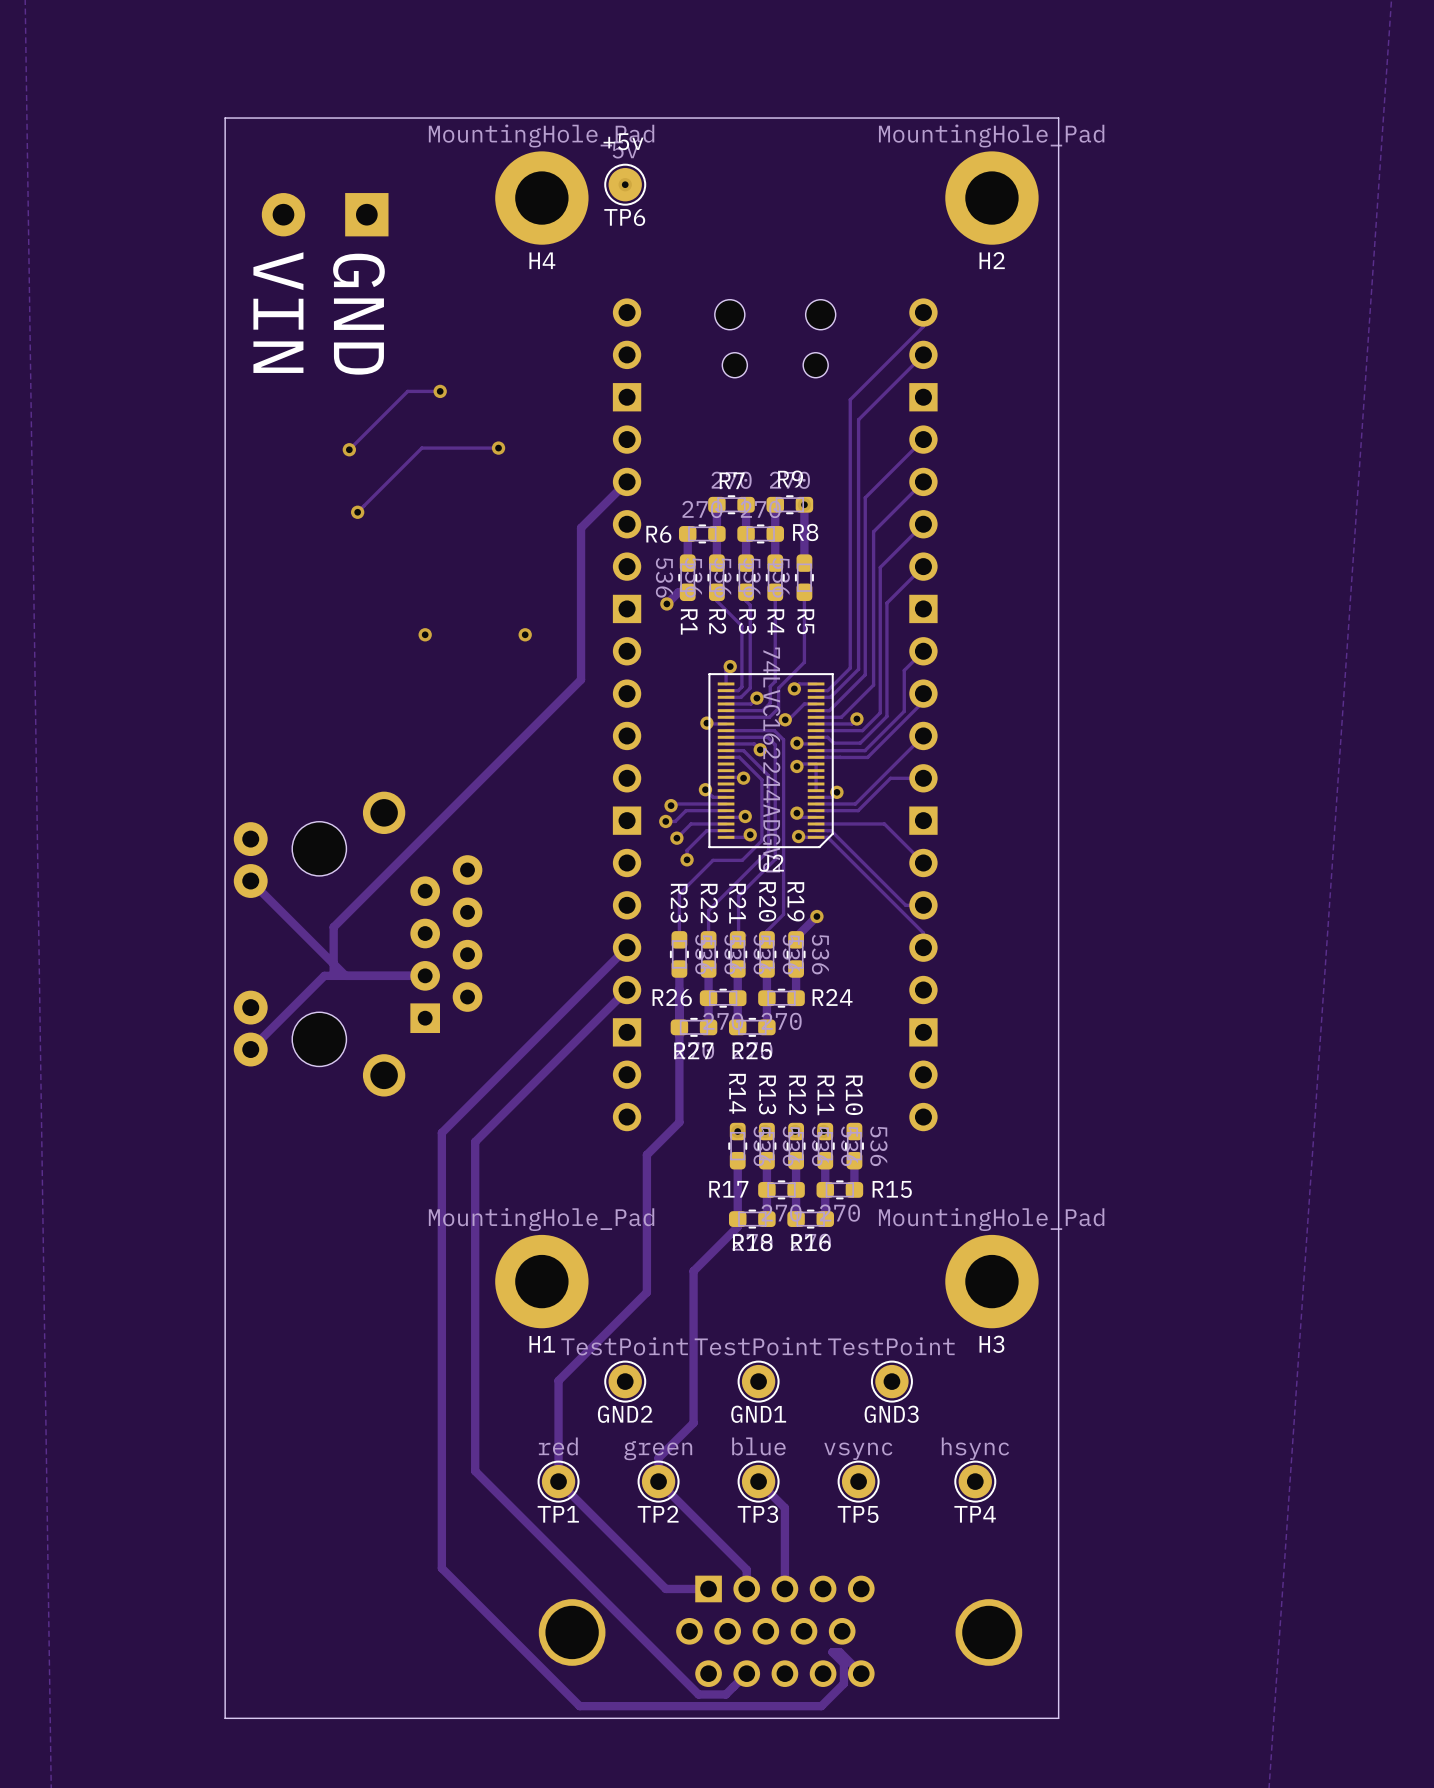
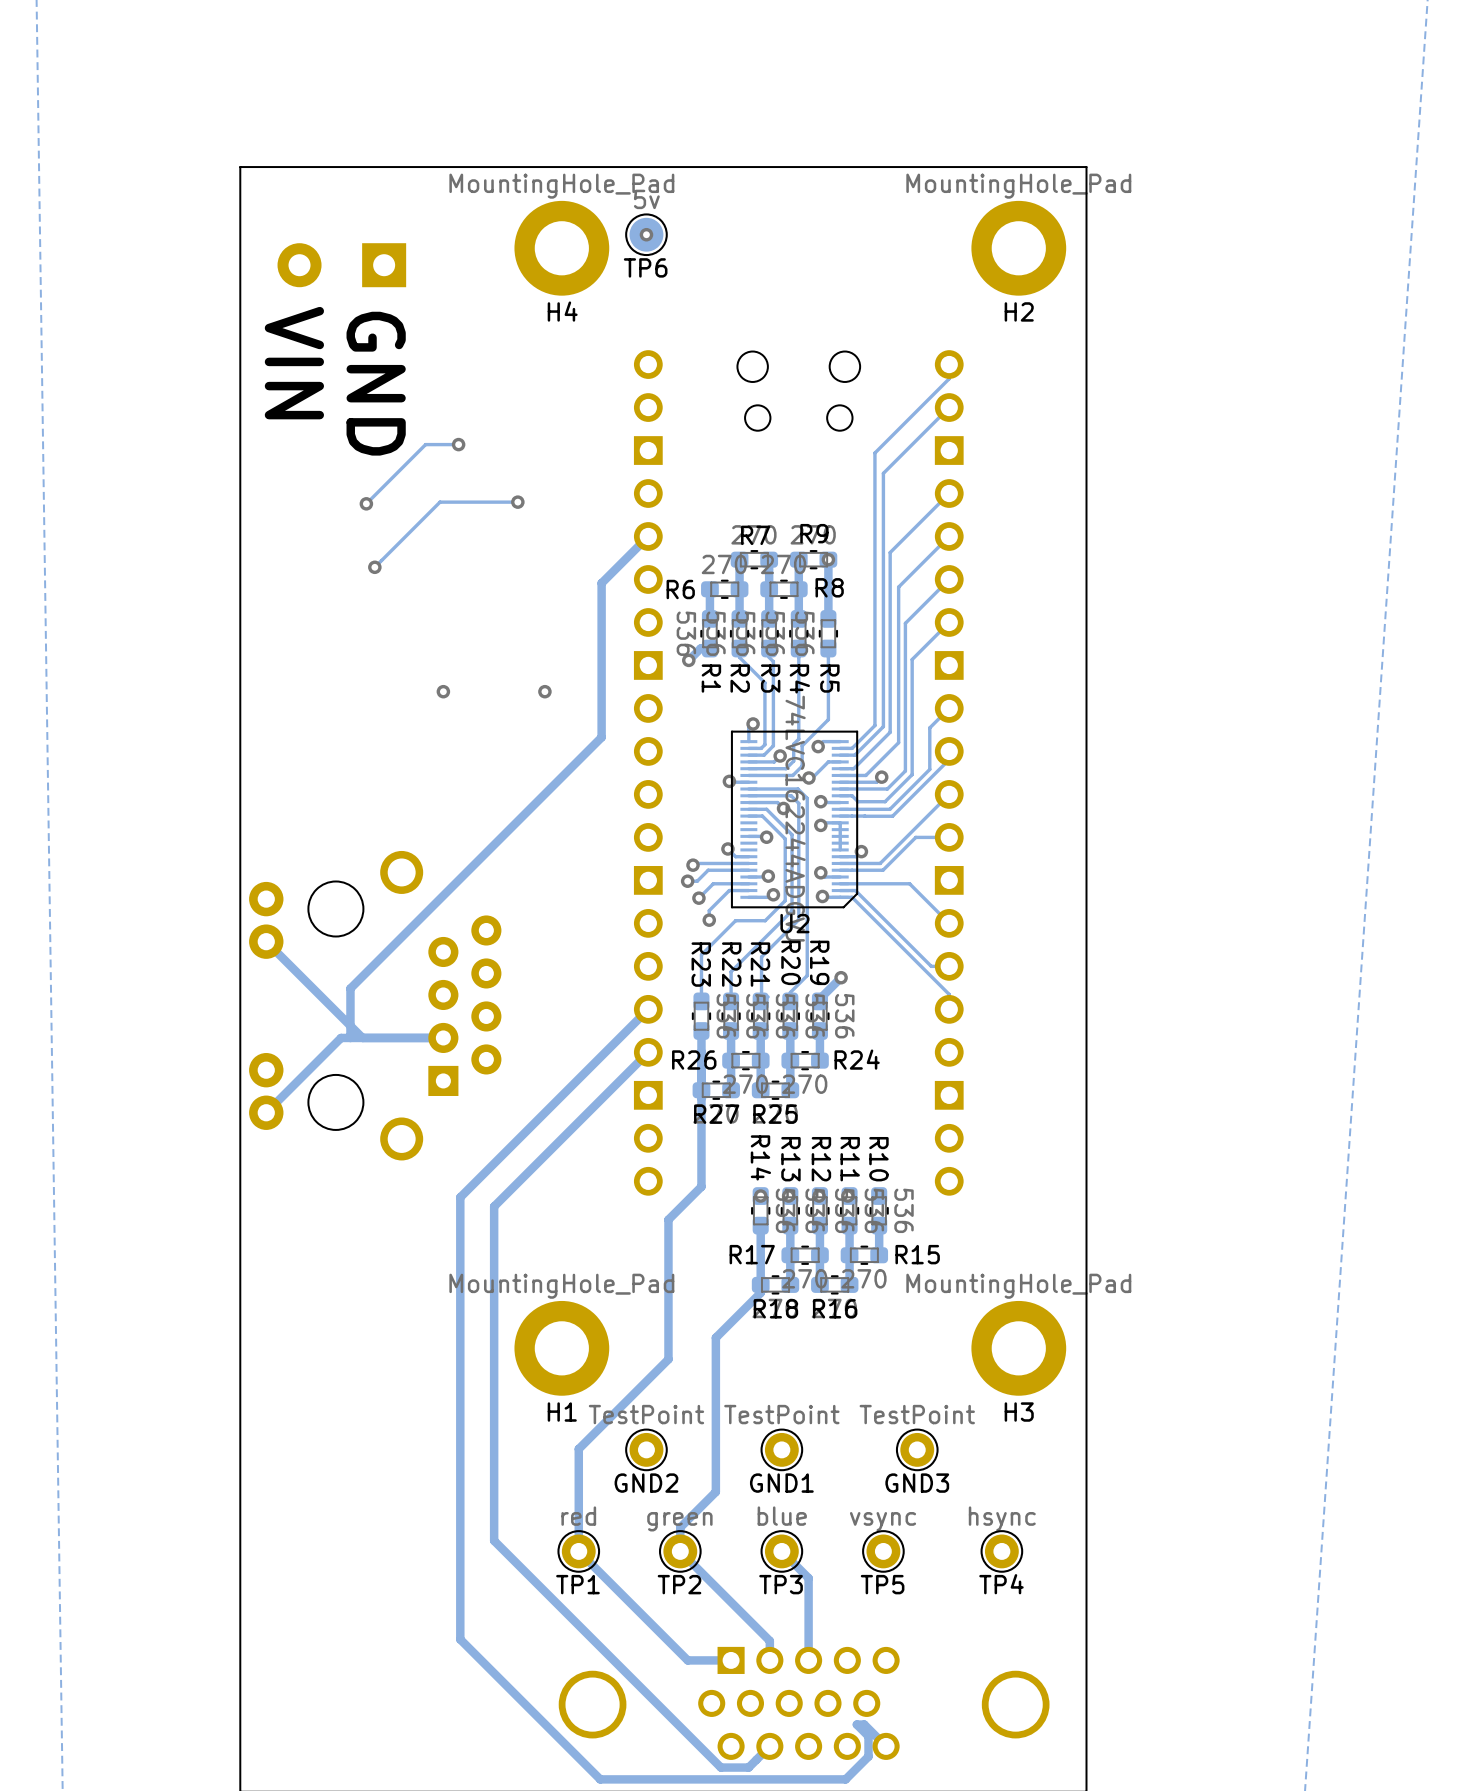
text: +5v (623, 141) -> none

